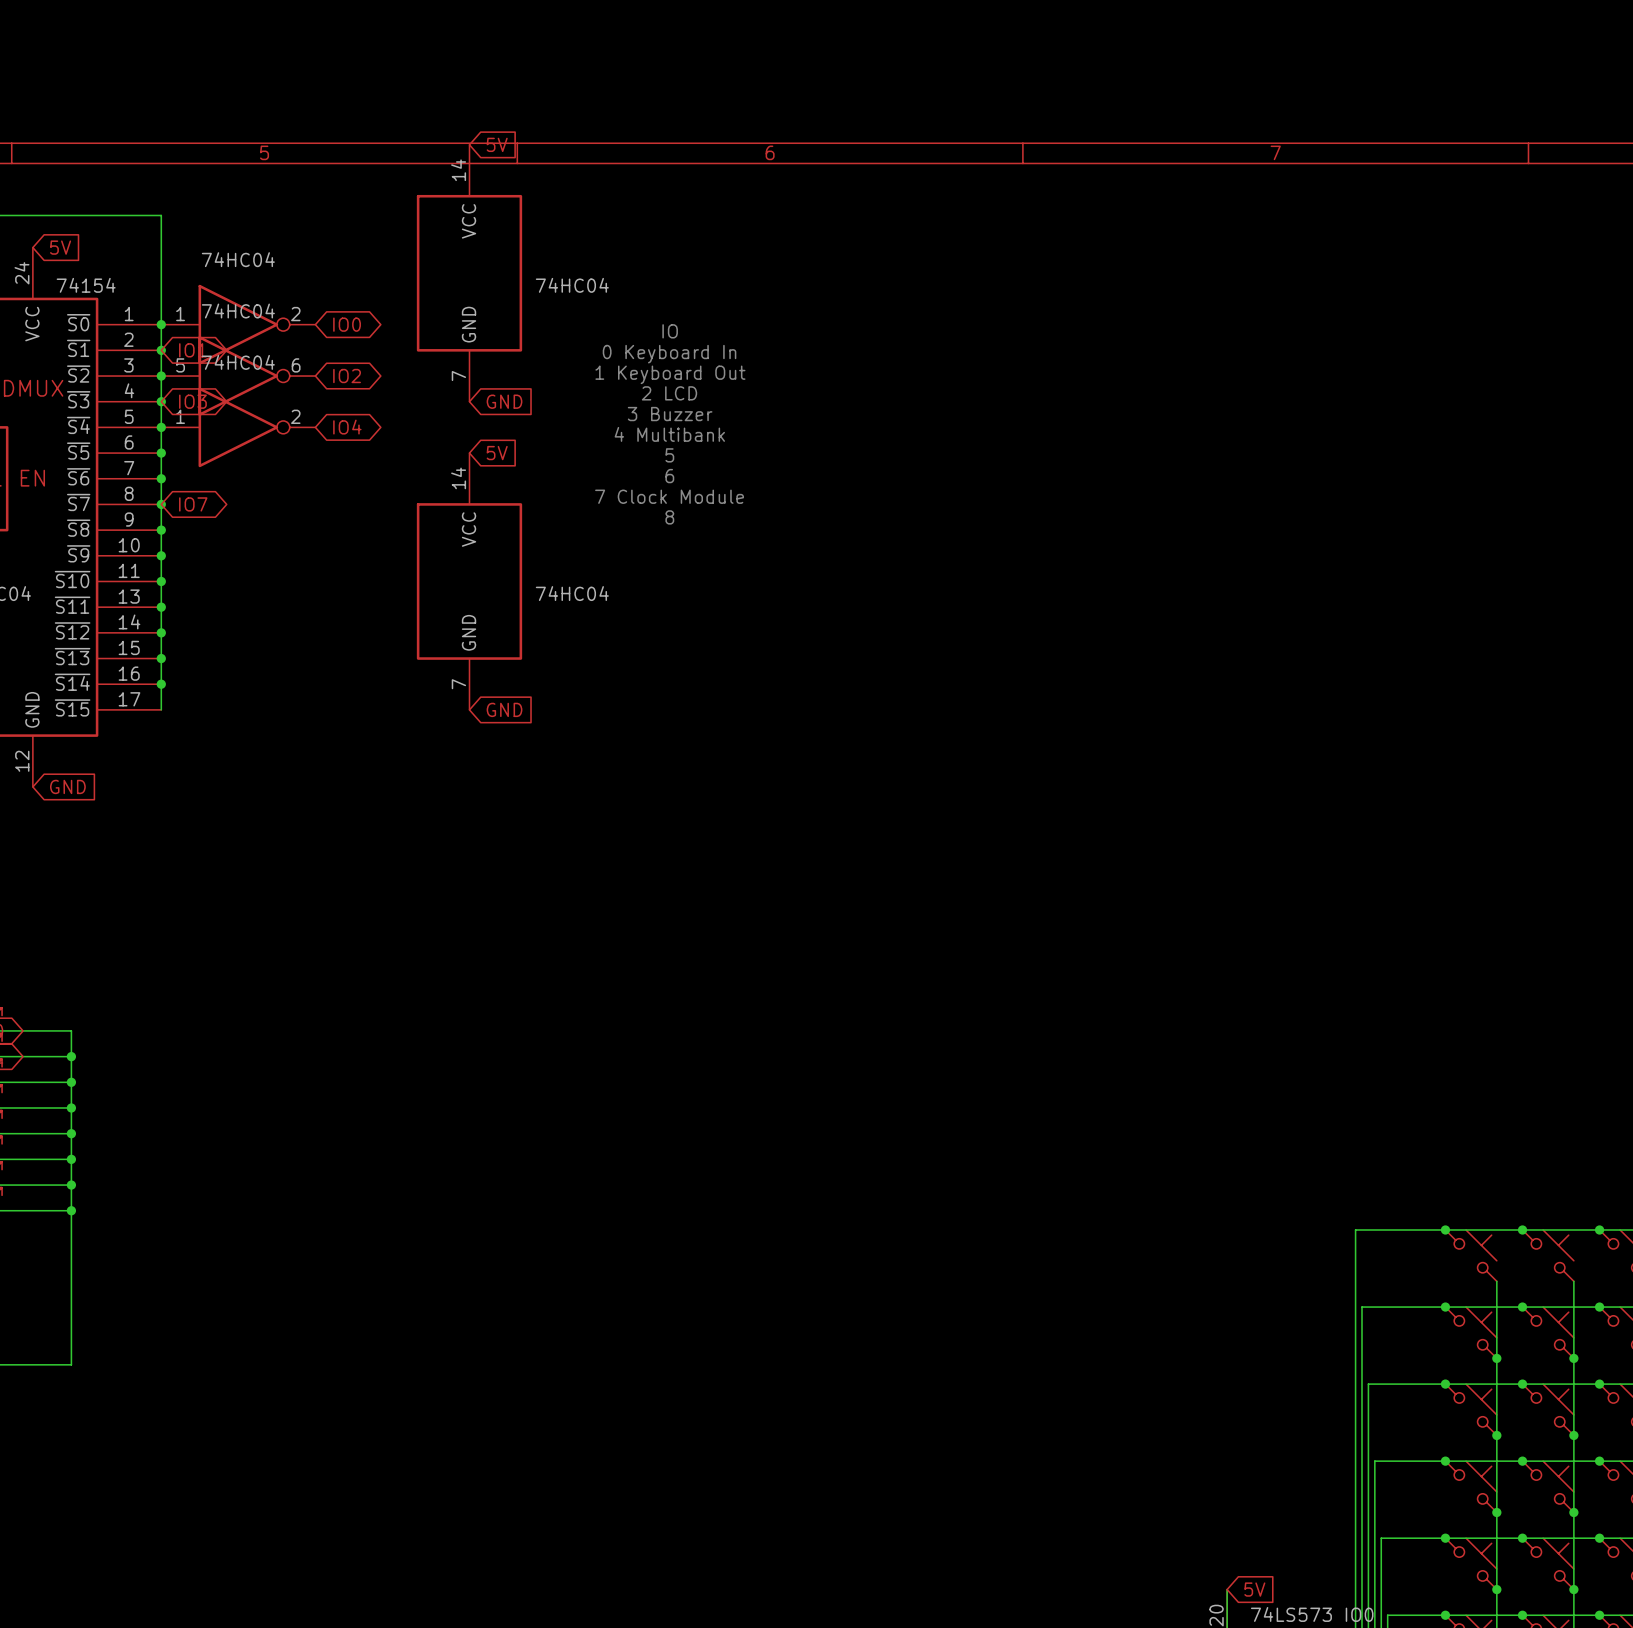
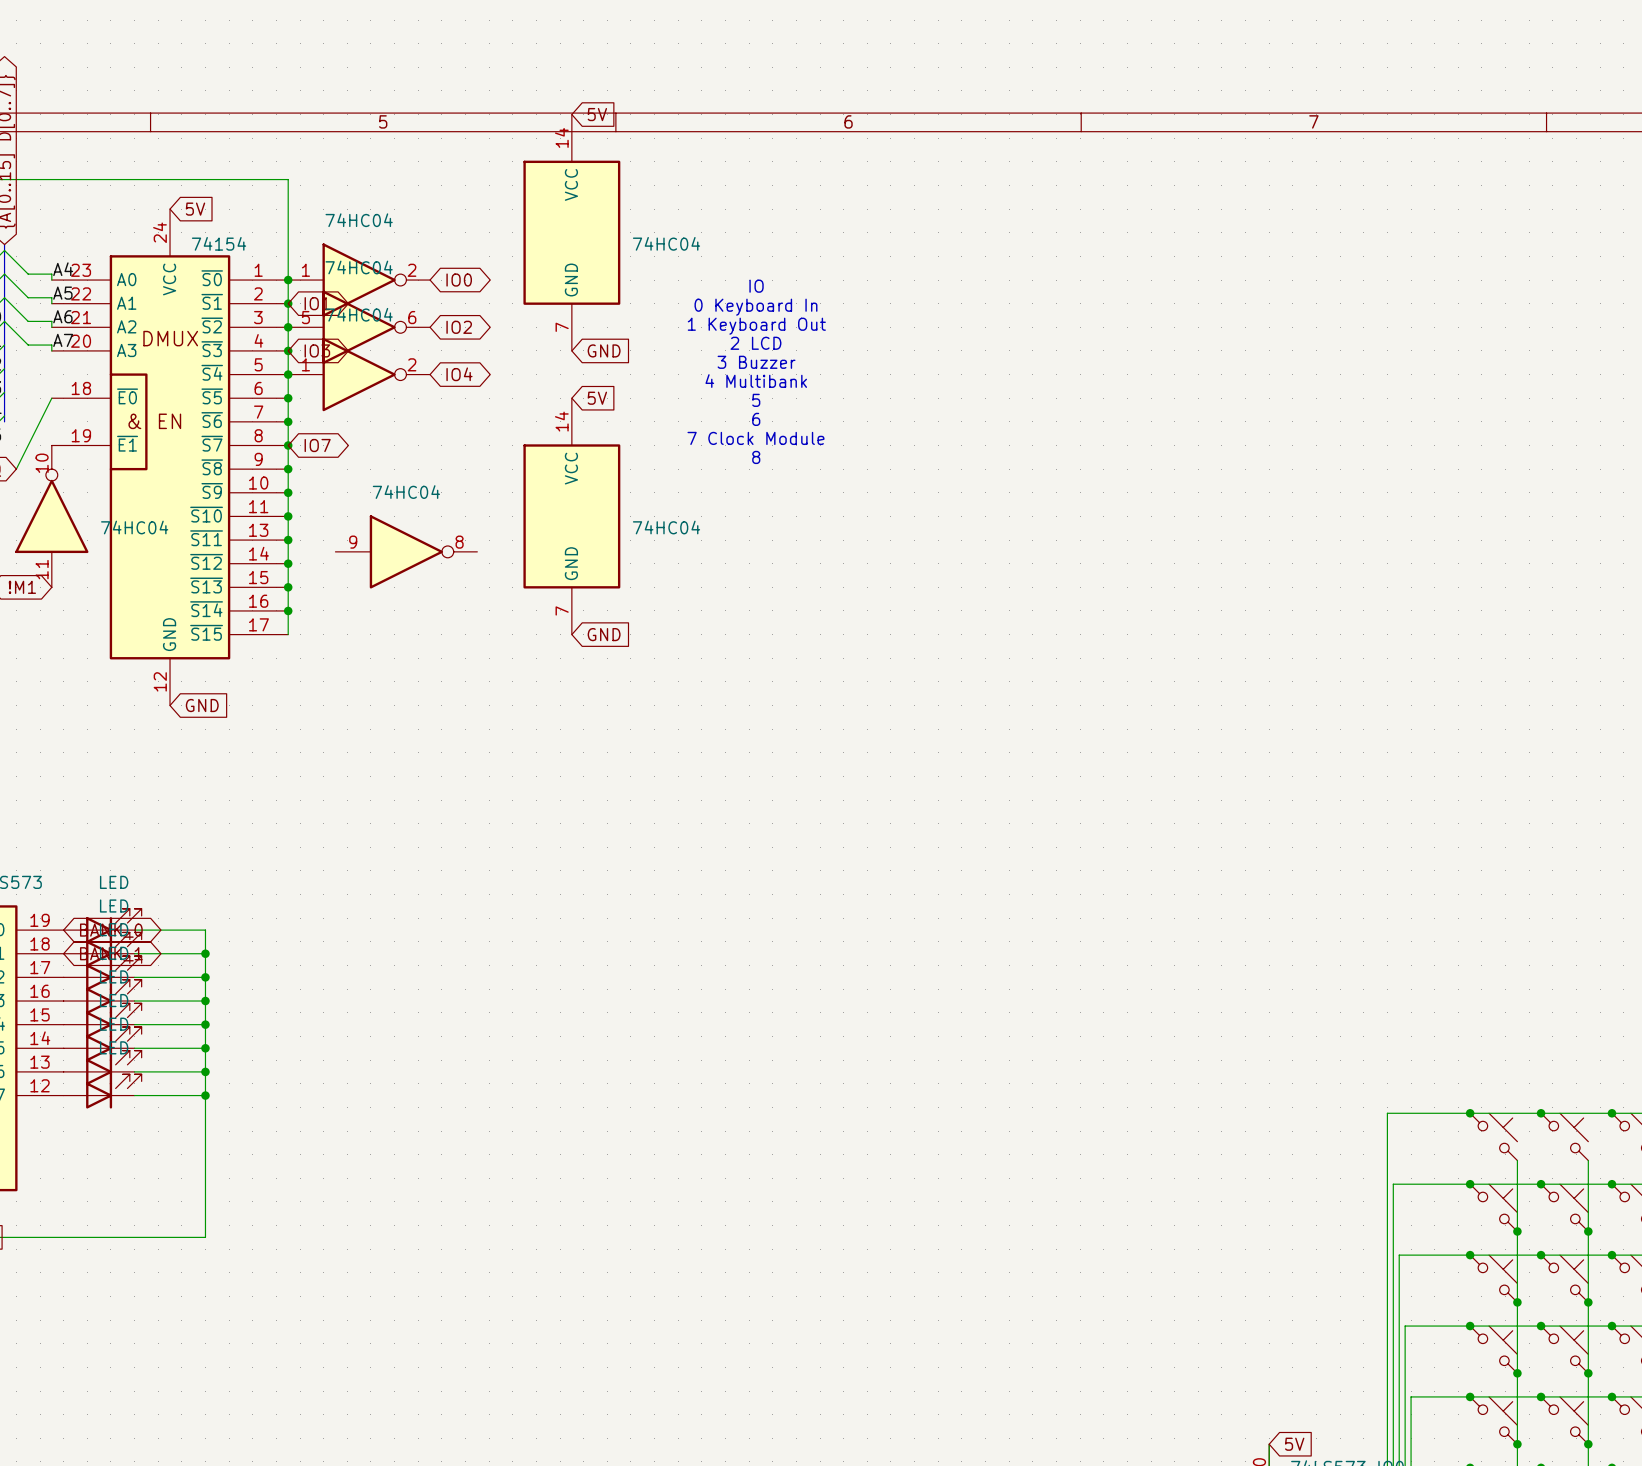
part: none -> 74HC04 (406, 551)

